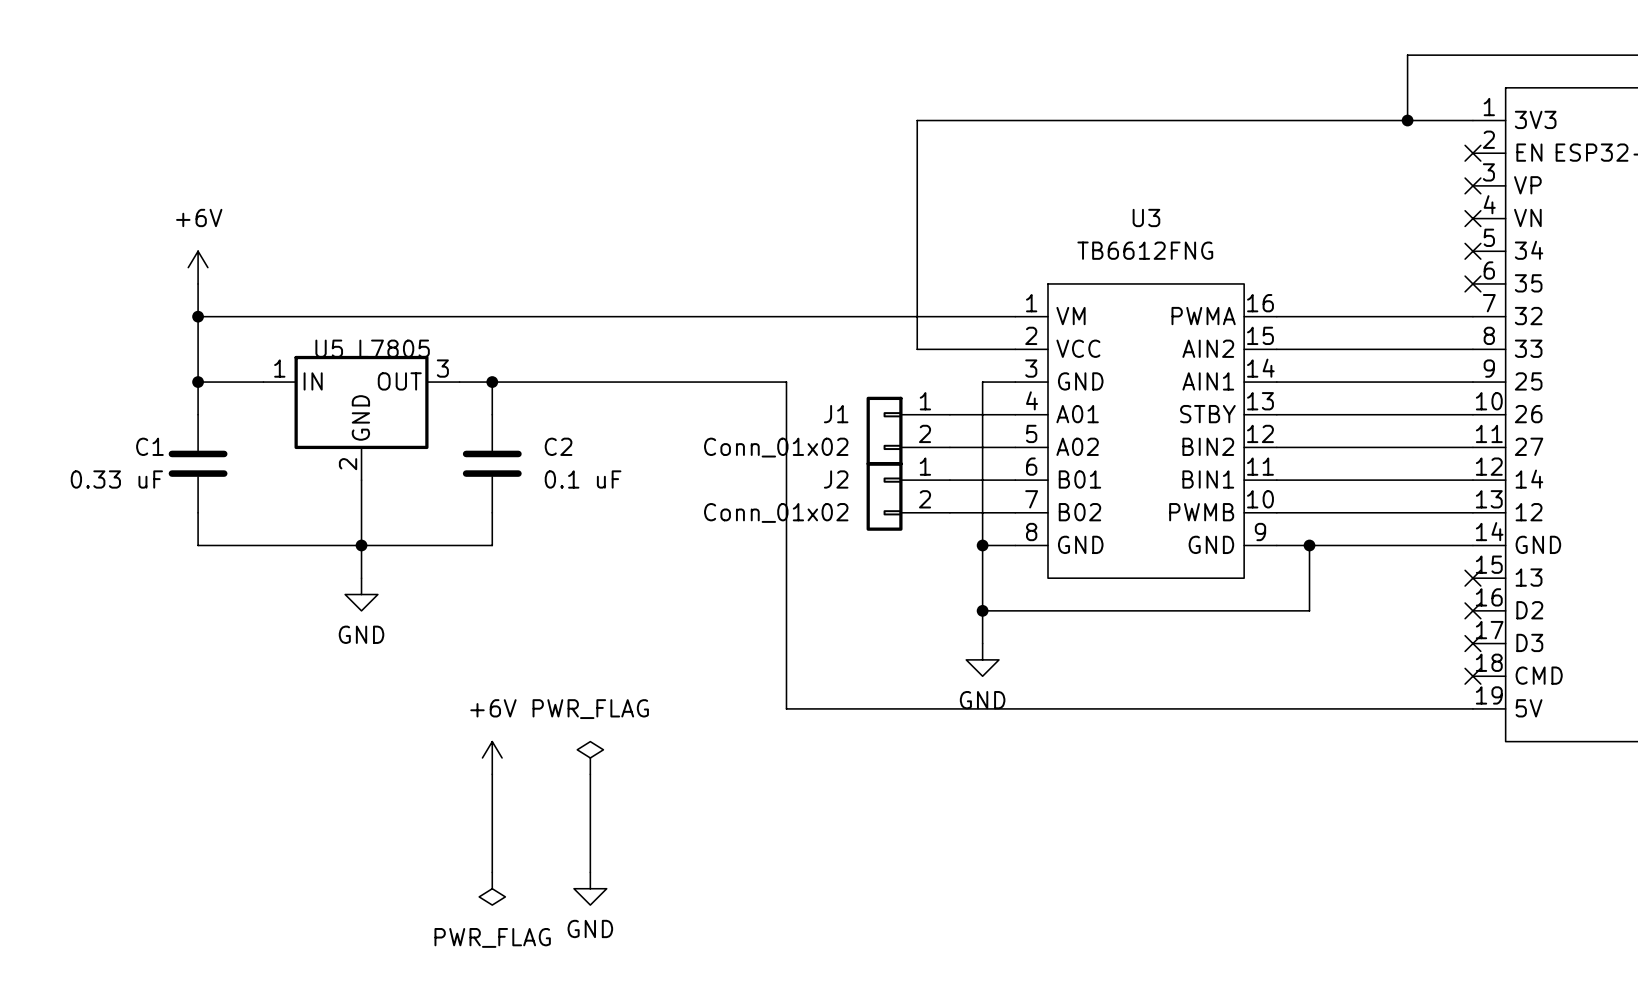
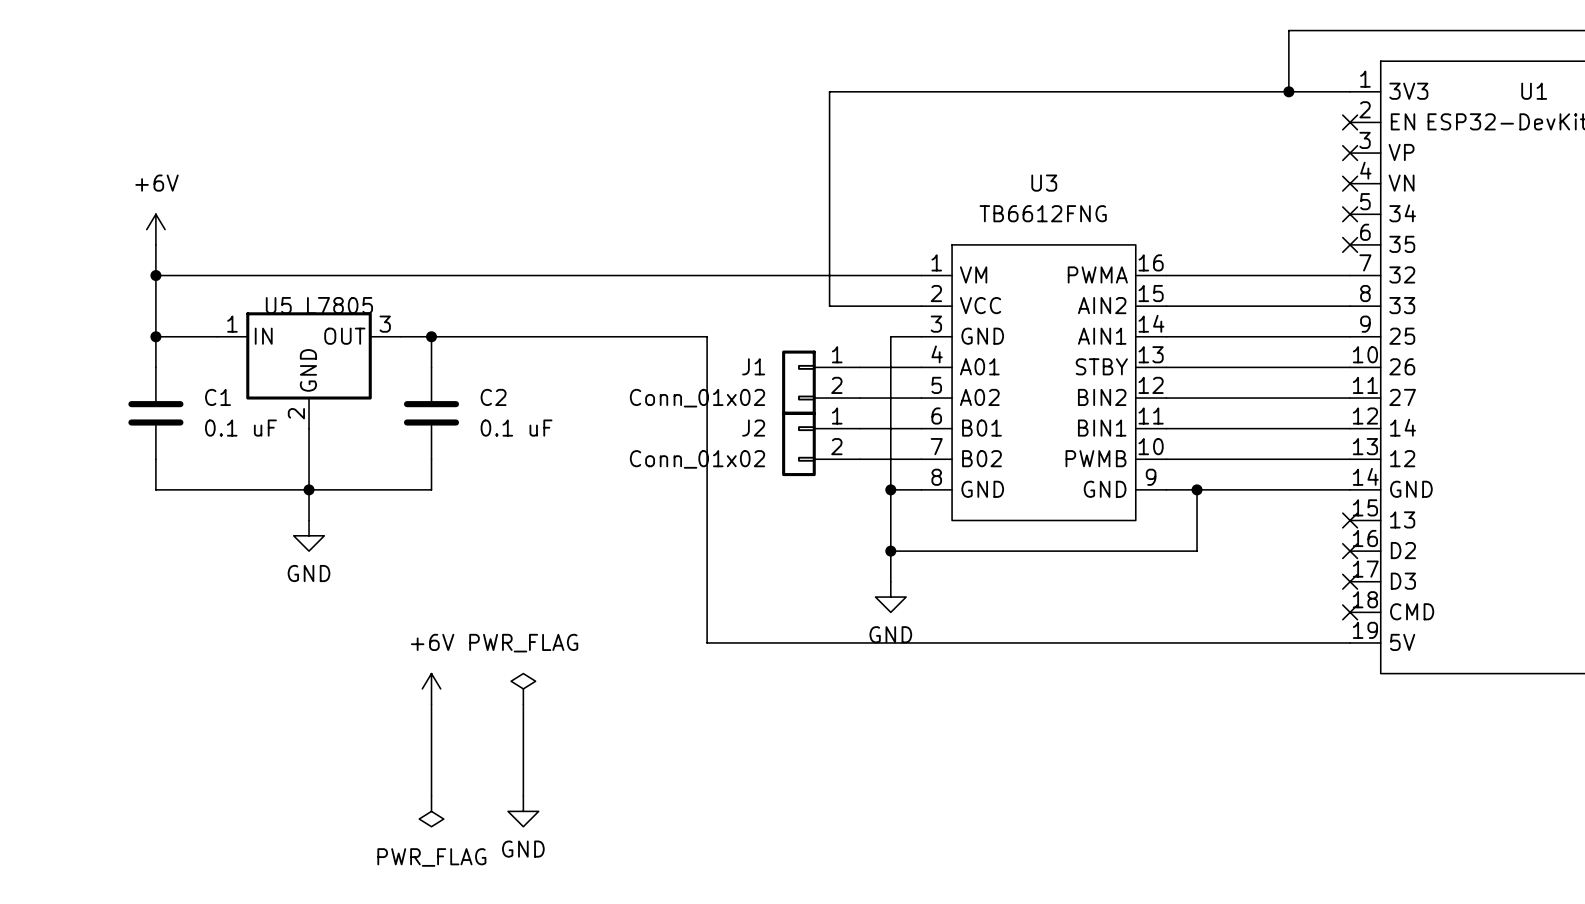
C1 name position: C1 (149, 446) -> C1 (218, 397)
C1 value: 0.33 uF (116, 479) -> 0.1 uF (240, 428)

